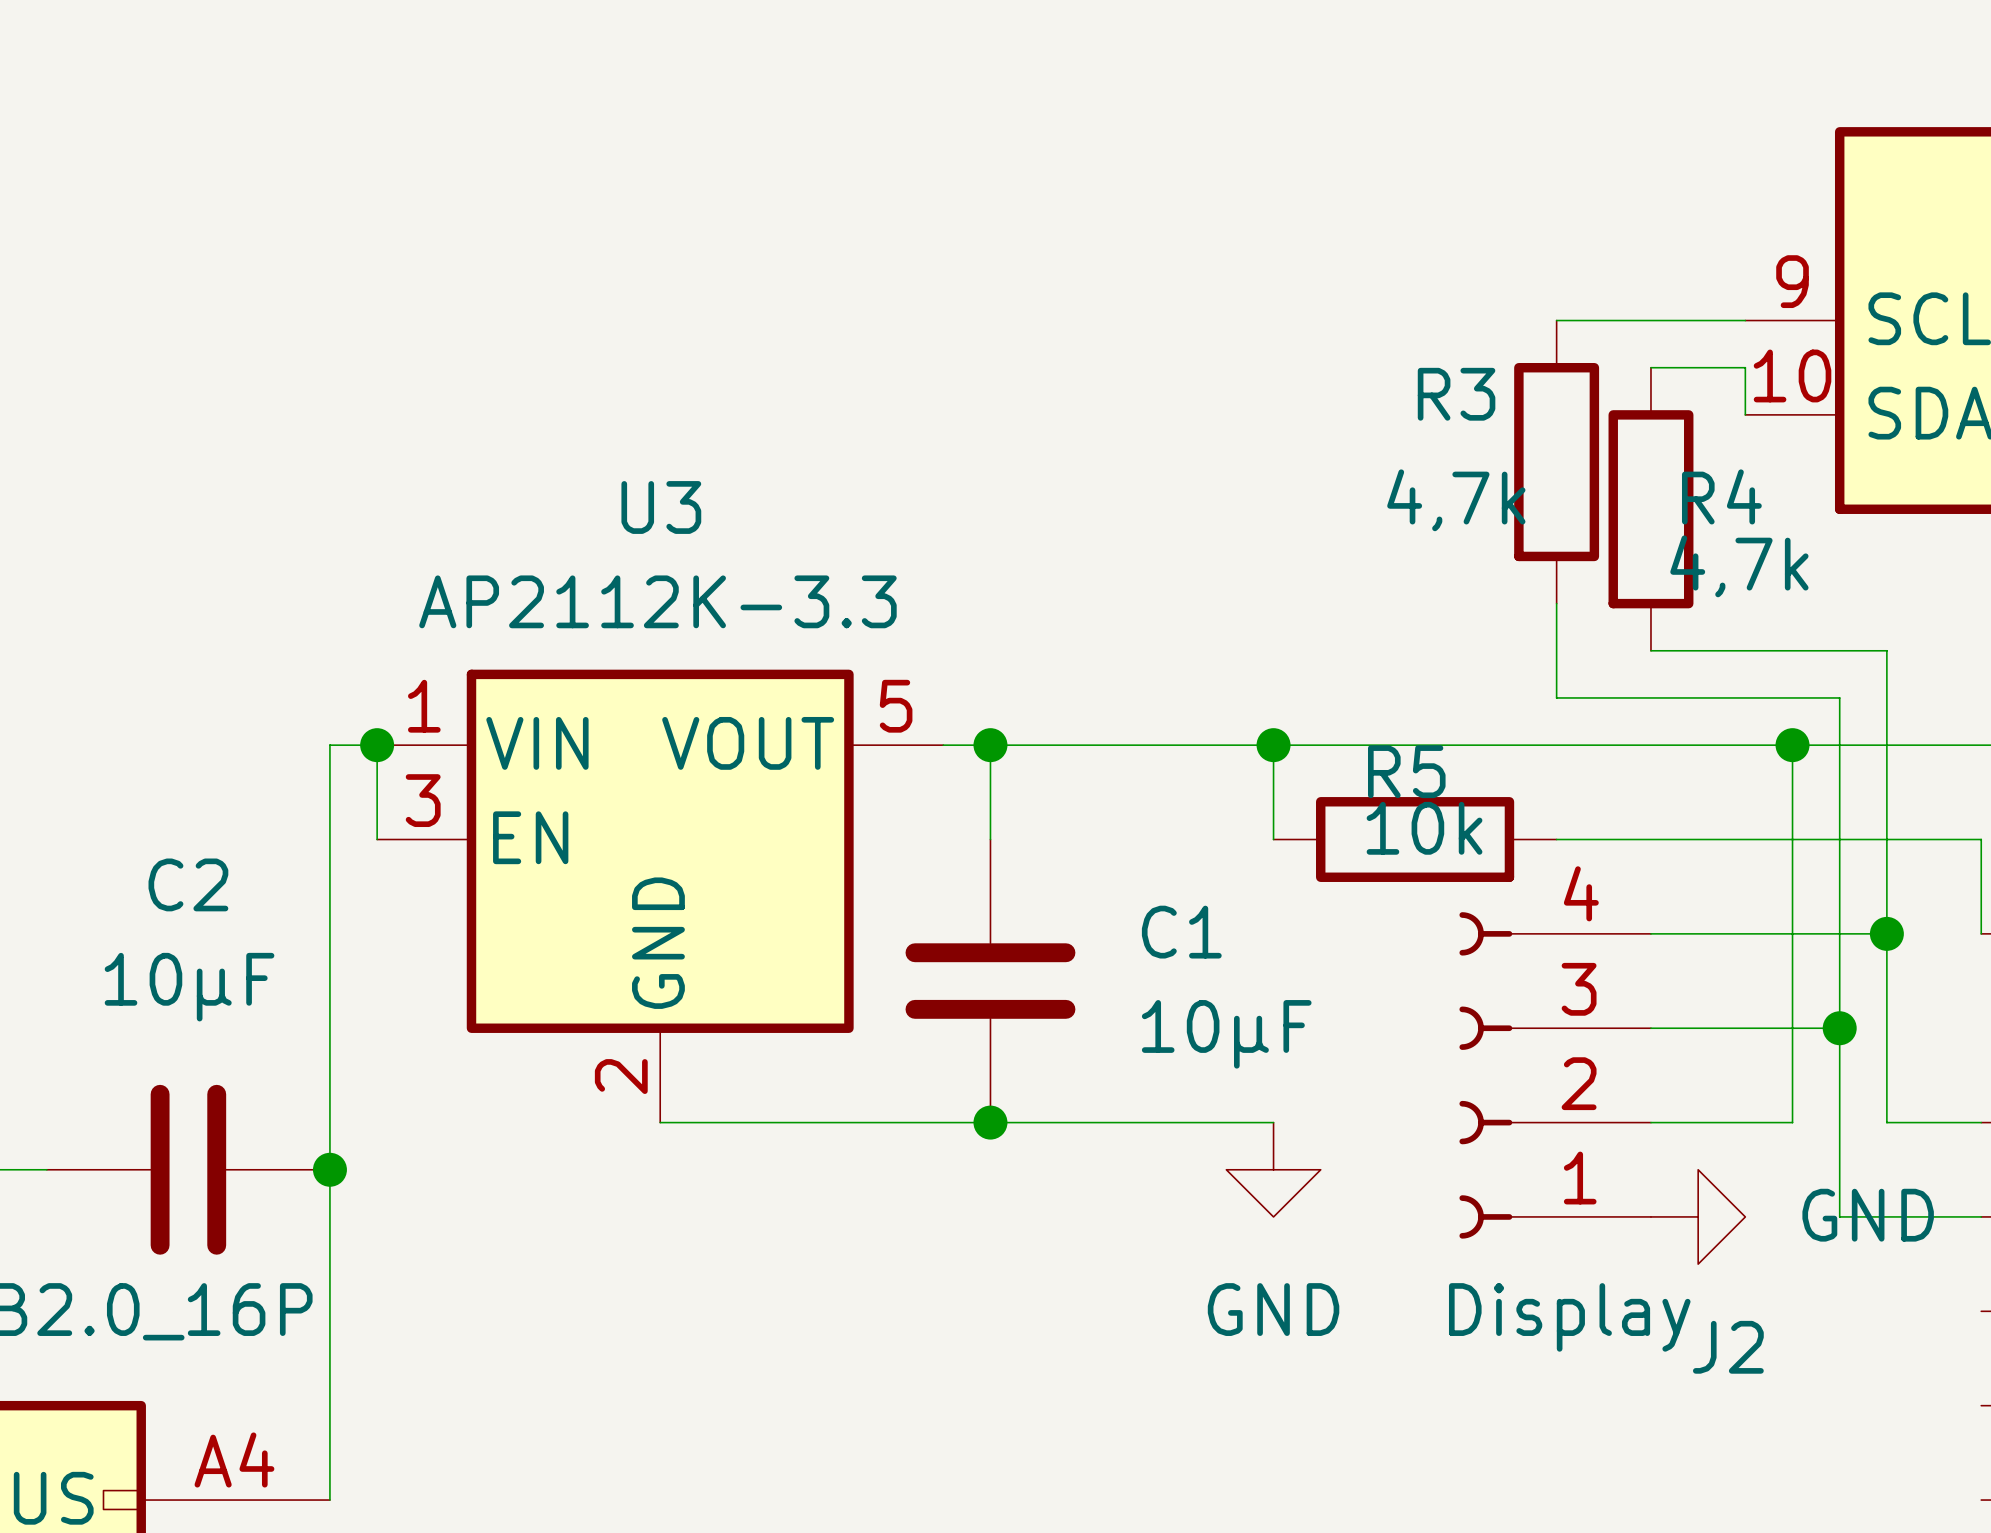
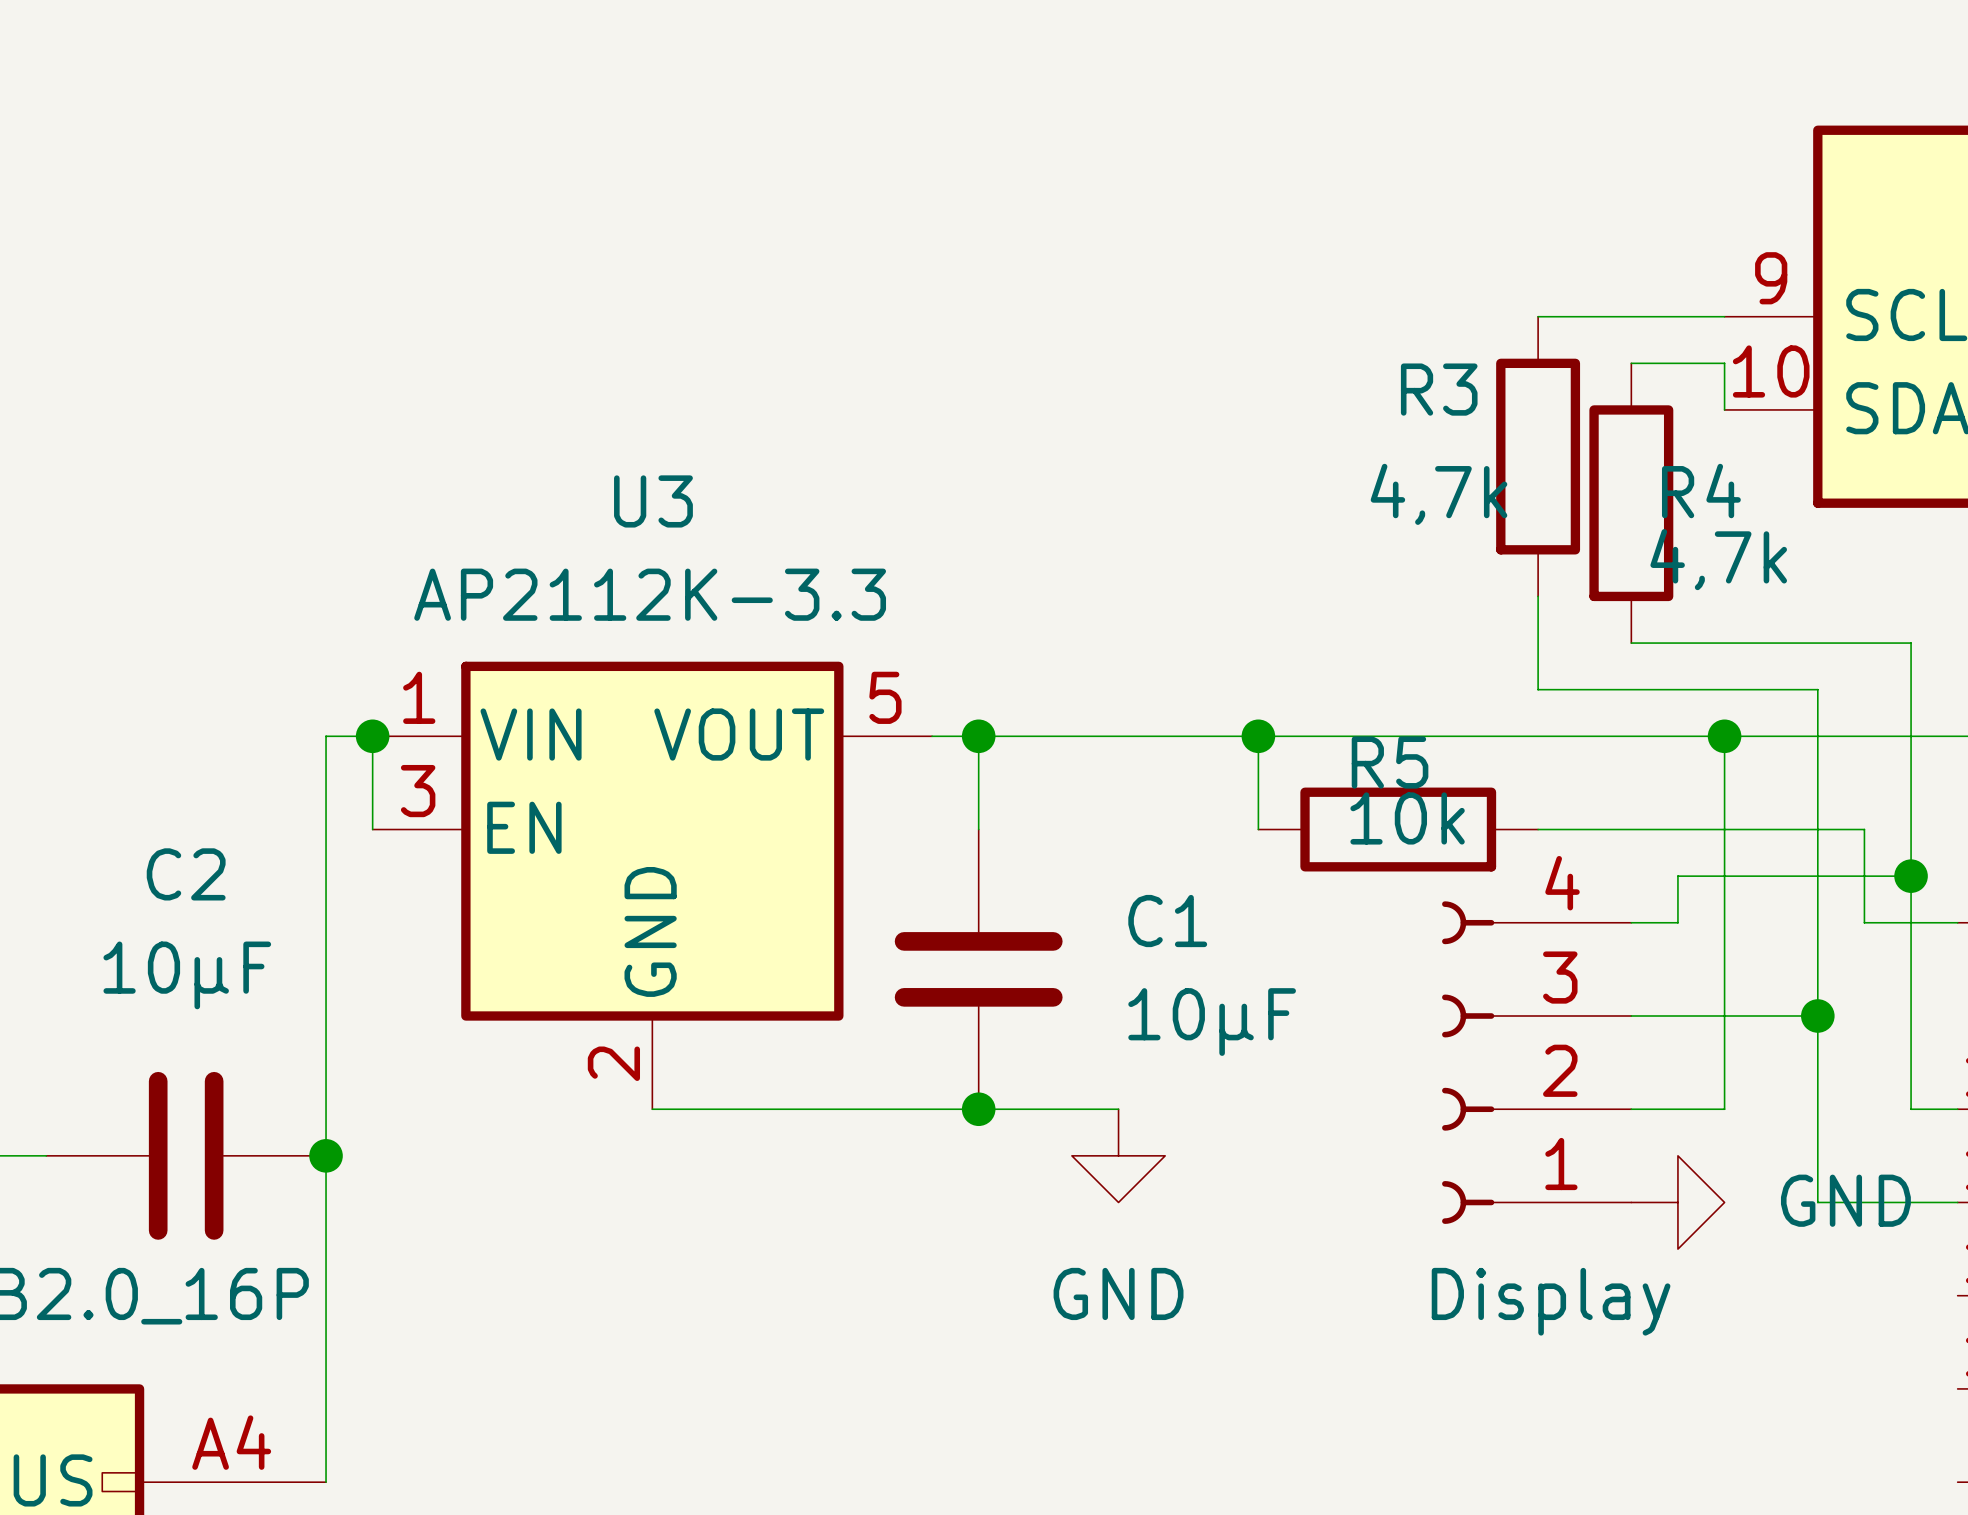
wire: (1886, 650) (1886, 839) (1981, 839) (1981, 933) -> (1864, 643) (1911, 643) (1911, 1109)
wire: (1792, 745) (1792, 1122) (1745, 1122) -> (1724, 736) (1724, 1109)
junction position: (1792, 745) -> (1724, 736)
wire: (1698, 933) (1886, 933) (1886, 1122) (1934, 1122) -> (1677, 922) (1677, 876) (1911, 876)
wire: none -> (1864, 922) (1957, 922)
junction position: (1886, 933) -> (1911, 876)
wire: (1132, 1122) (1273, 1122) -> none
power symbol position: GND (1273, 1169) -> GND (1118, 1155)
J2 name: J2 (1728, 1347) -> none

